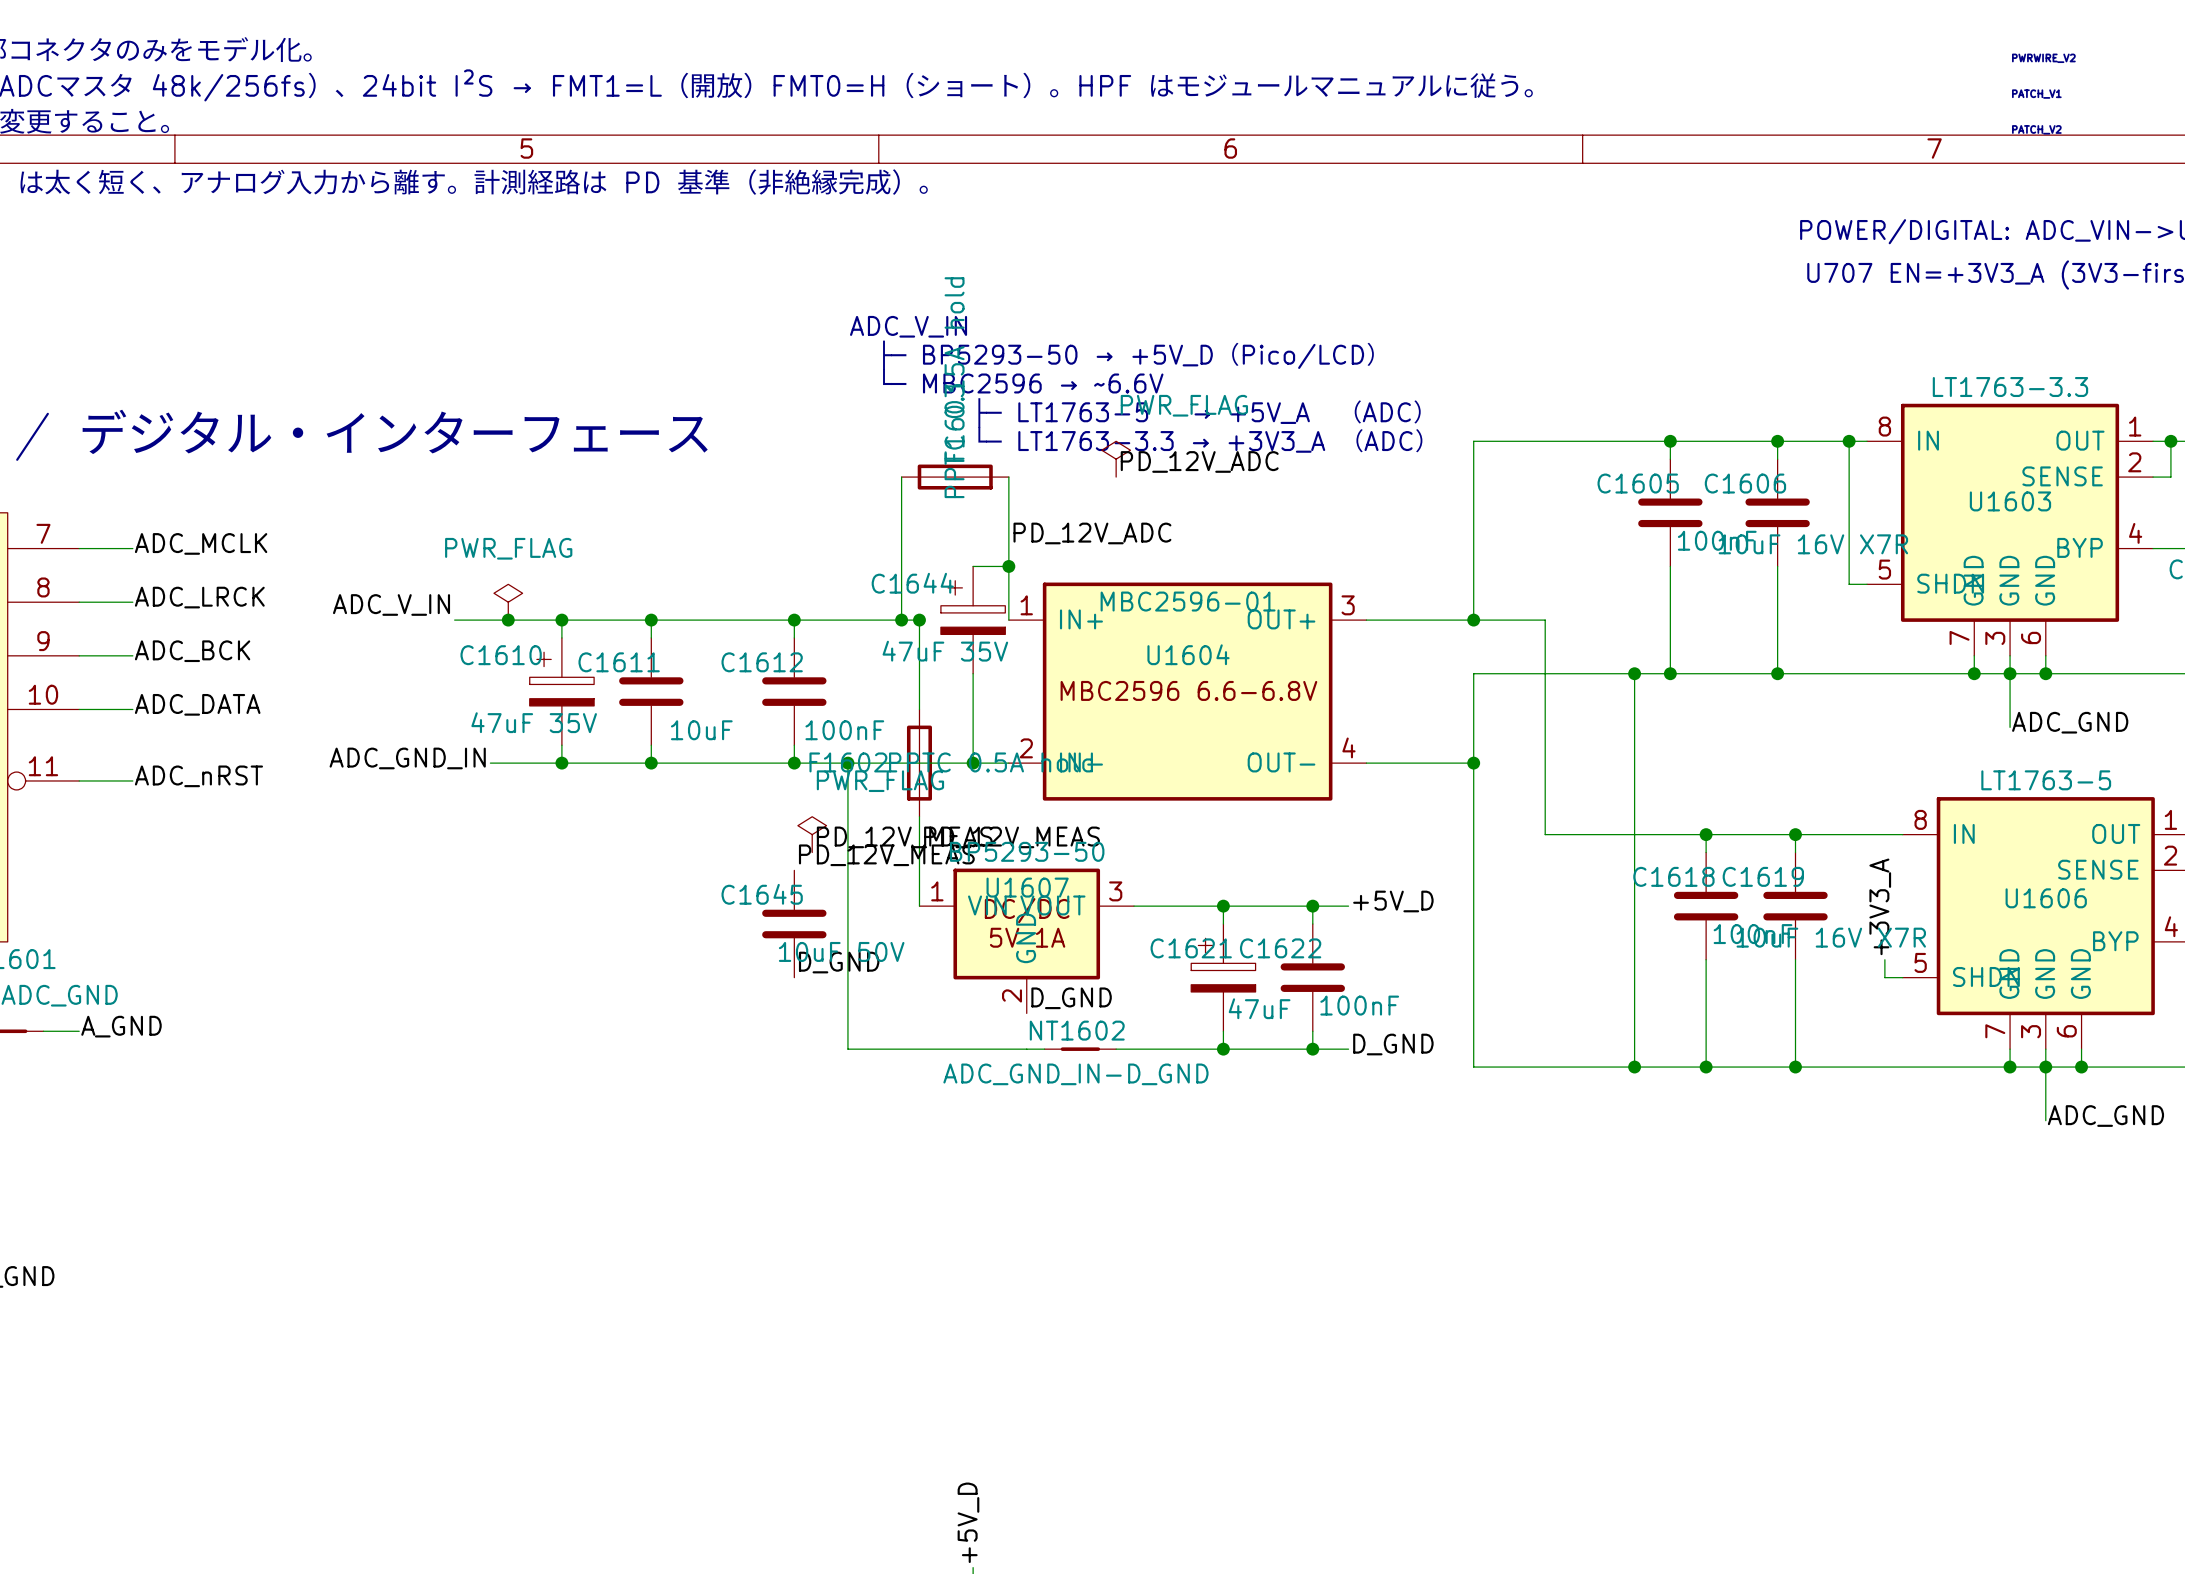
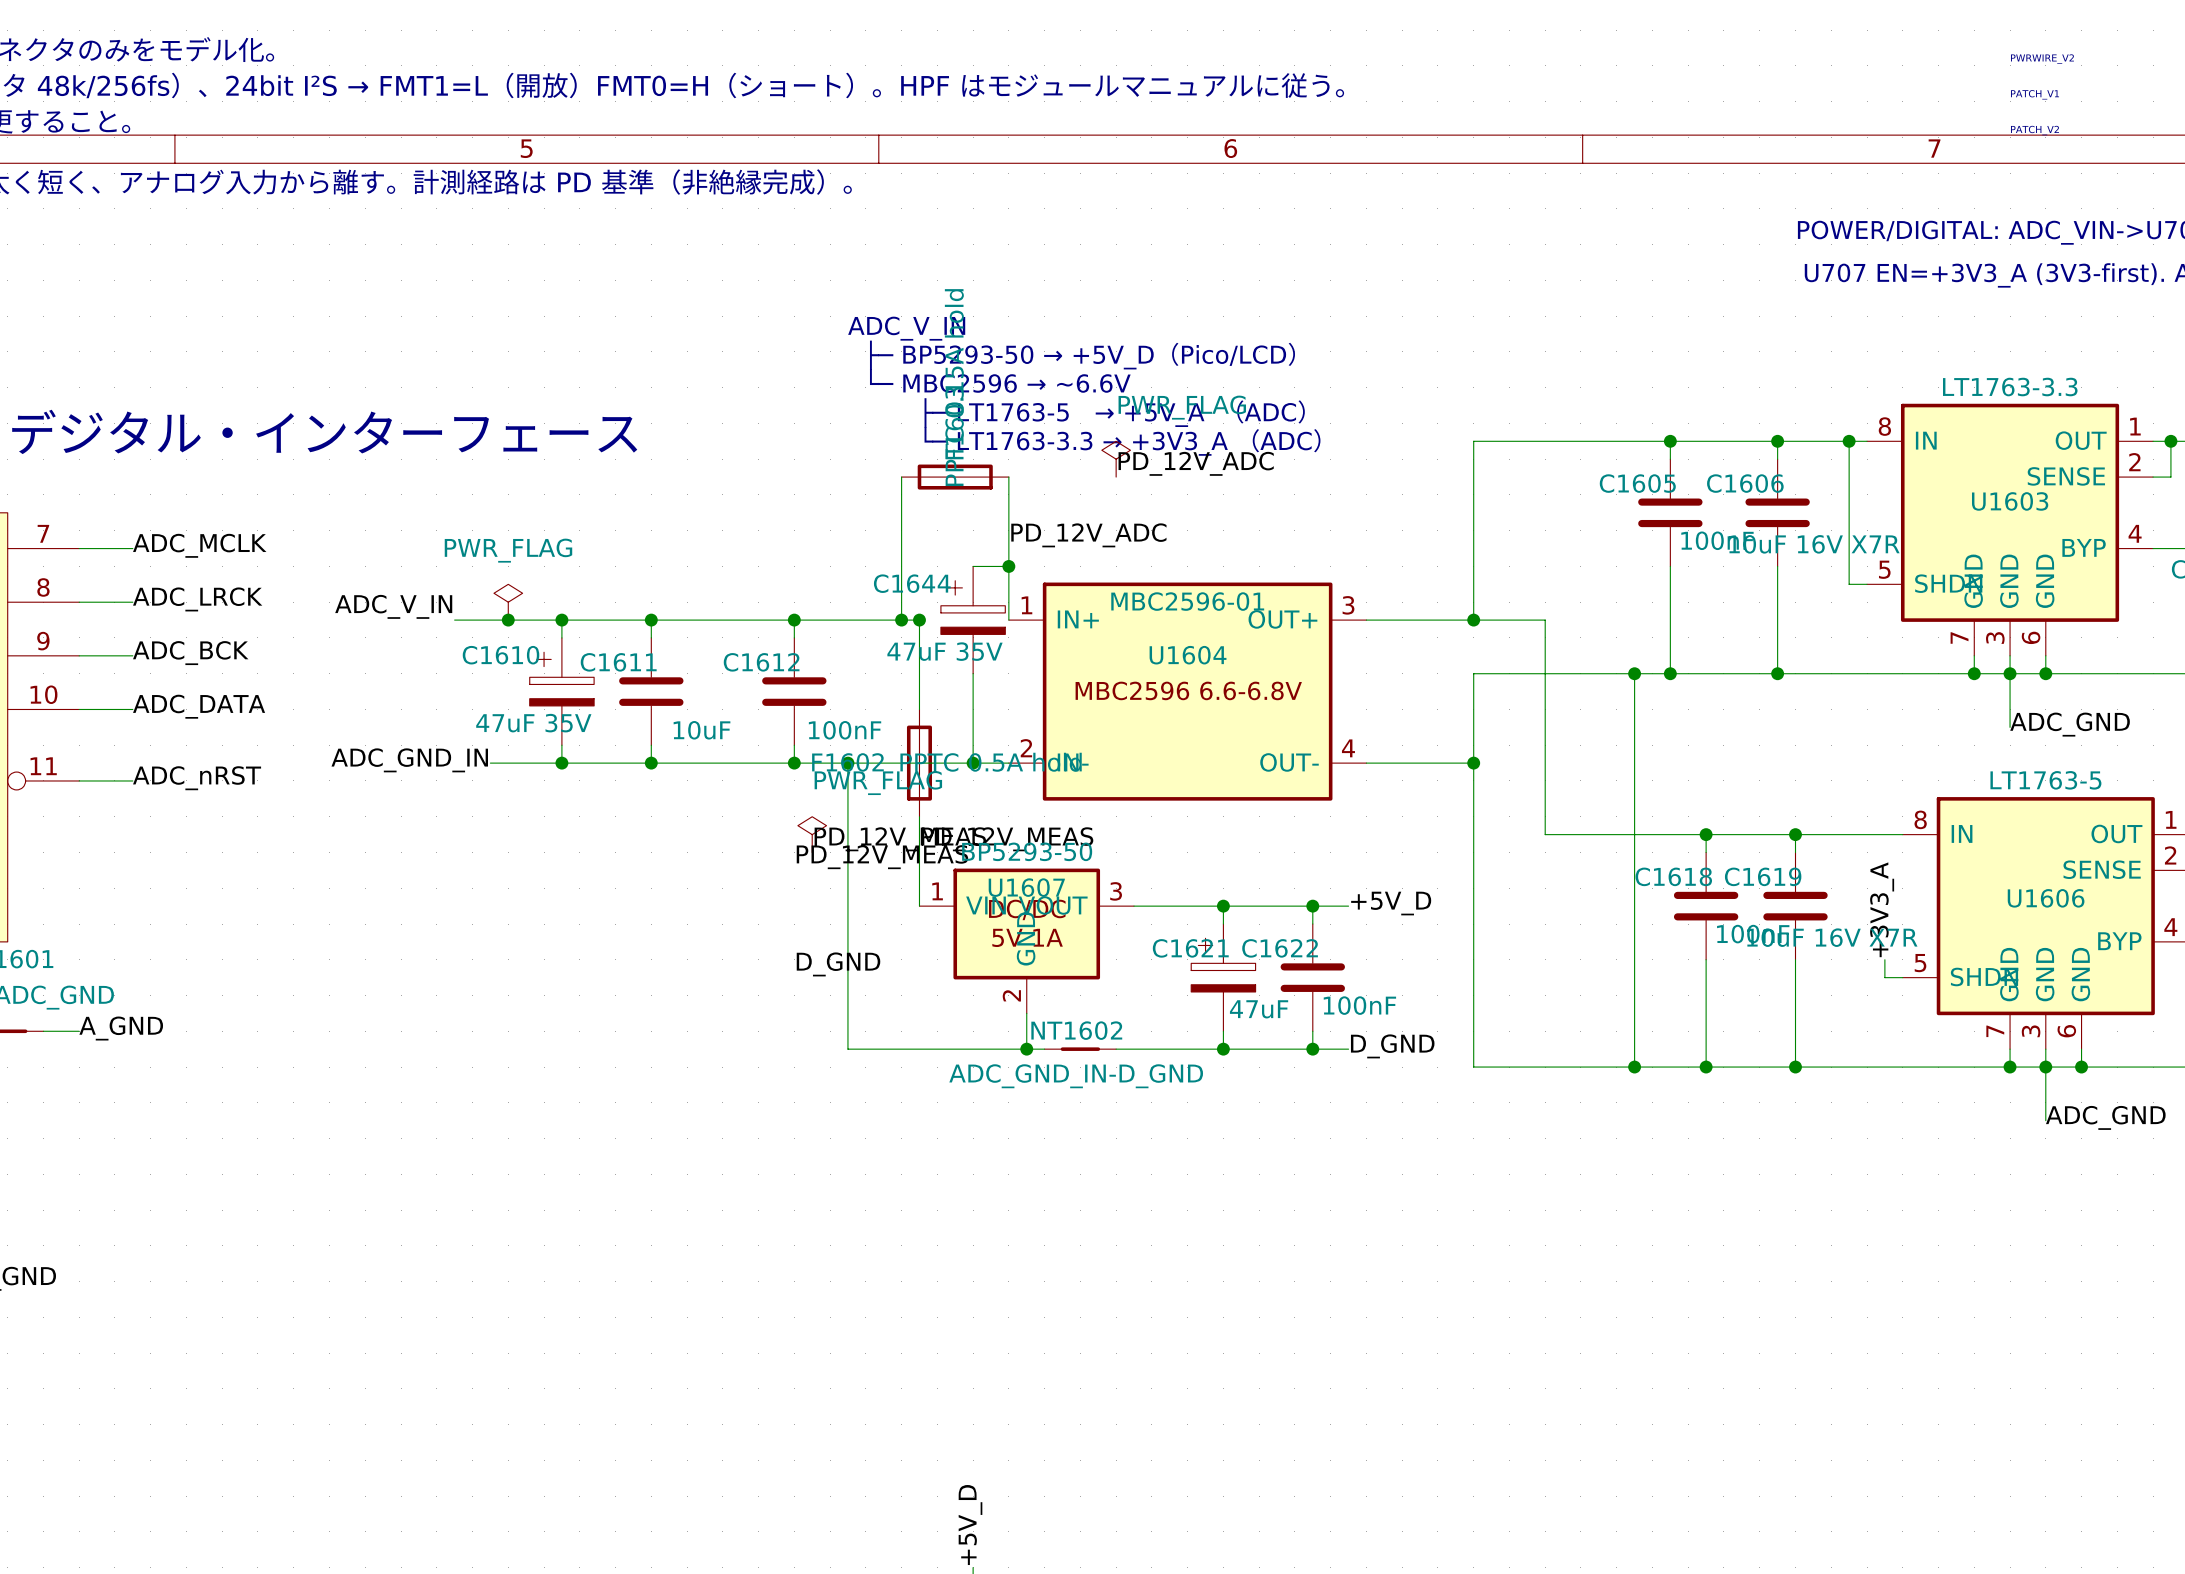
C1645: 10uF 50V (794, 924) -> none
label: D_GND (1071, 998) -> none
wire: none -> (1026, 1013) (1026, 1049)
junction: none -> (1026, 1049)

